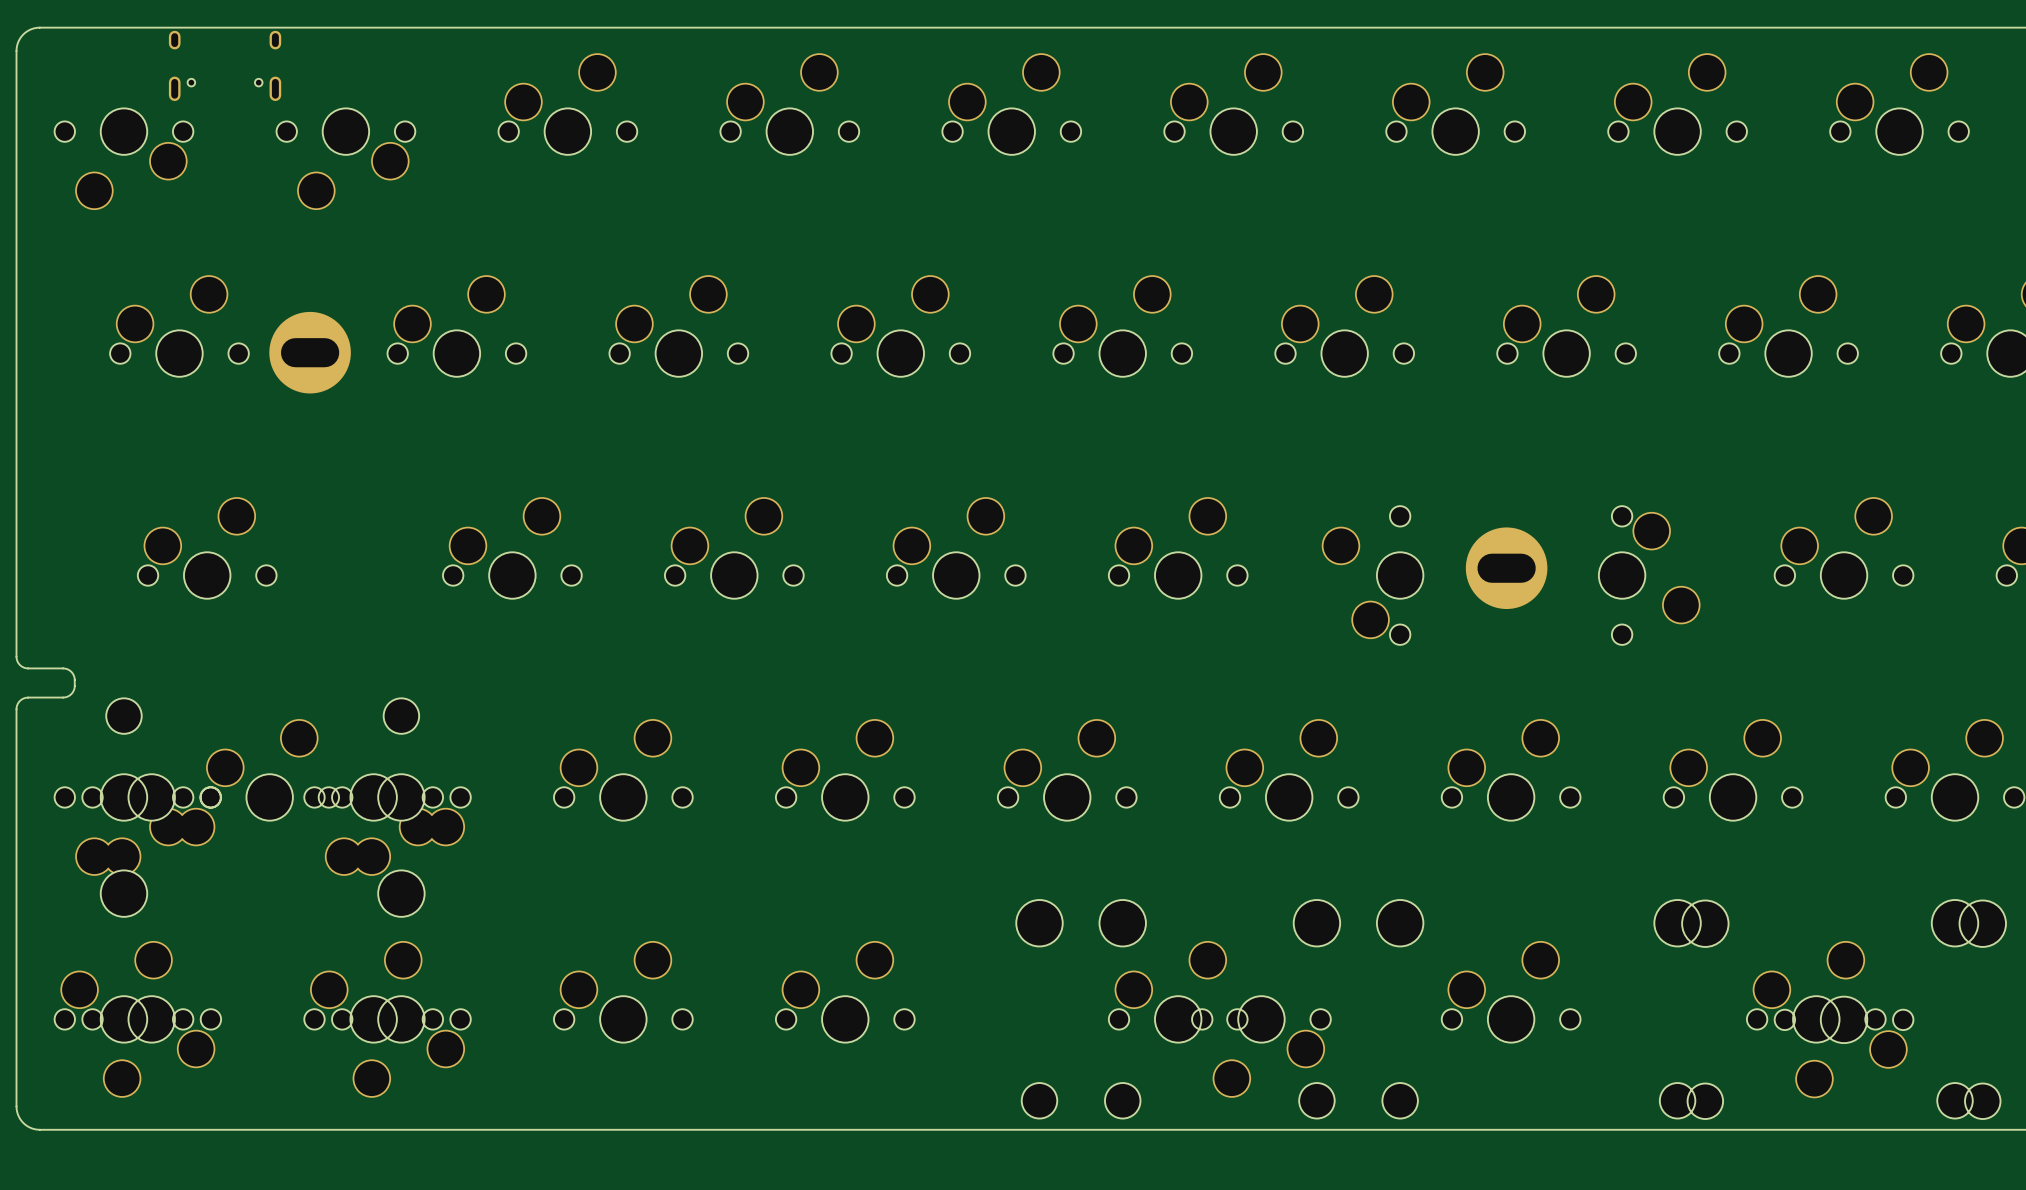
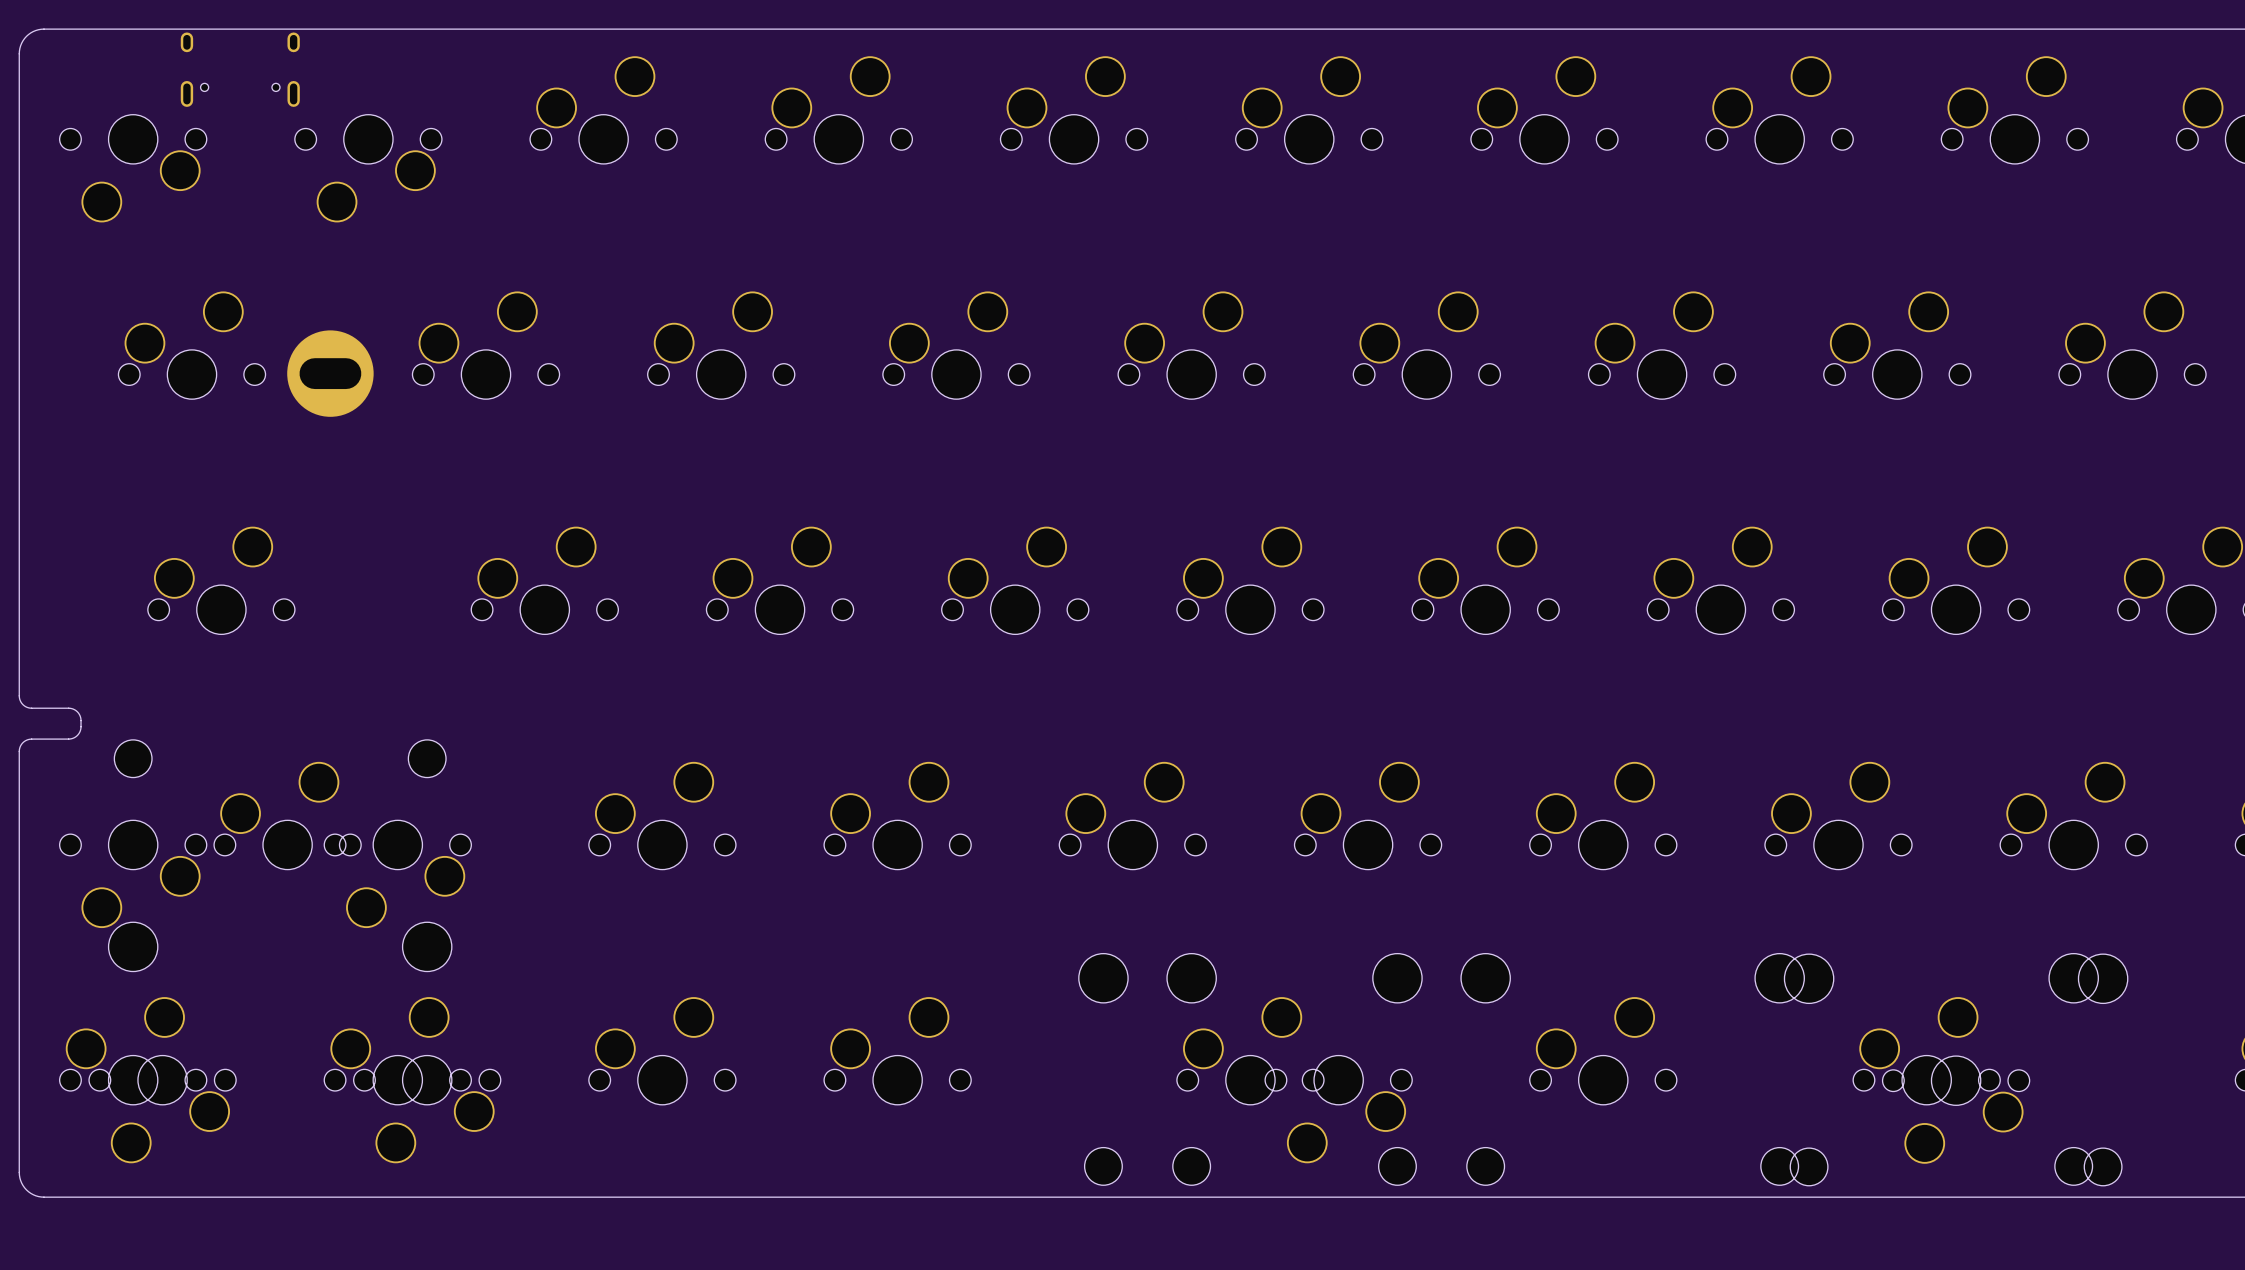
part: (1506, 568) -> none
part rotation: 0° (1372, 575) -> 90° clockwise (1485, 580)
part rotation: 0° (1649, 575) -> 90° counterclockwise (1720, 580)
part: (151, 825) -> none
part: (401, 825) -> none

